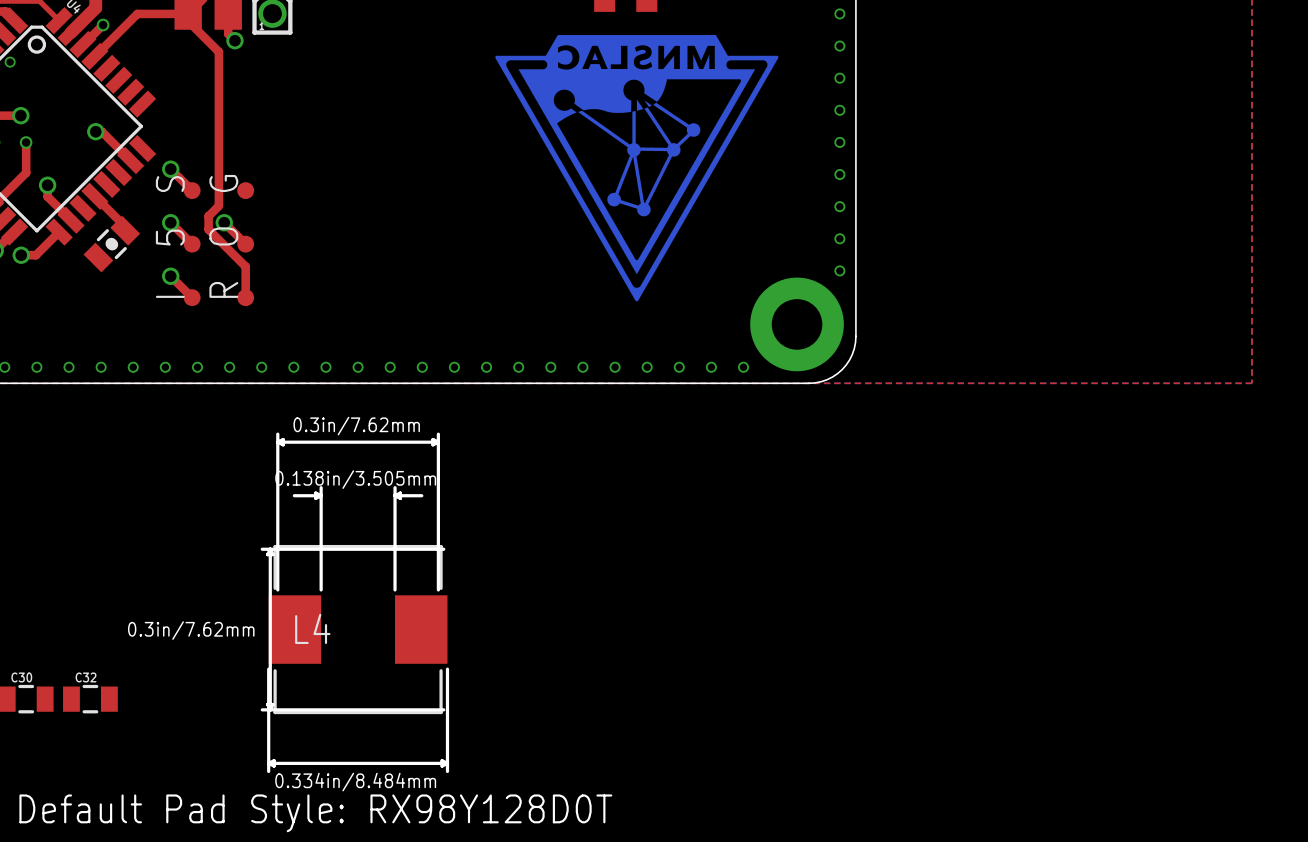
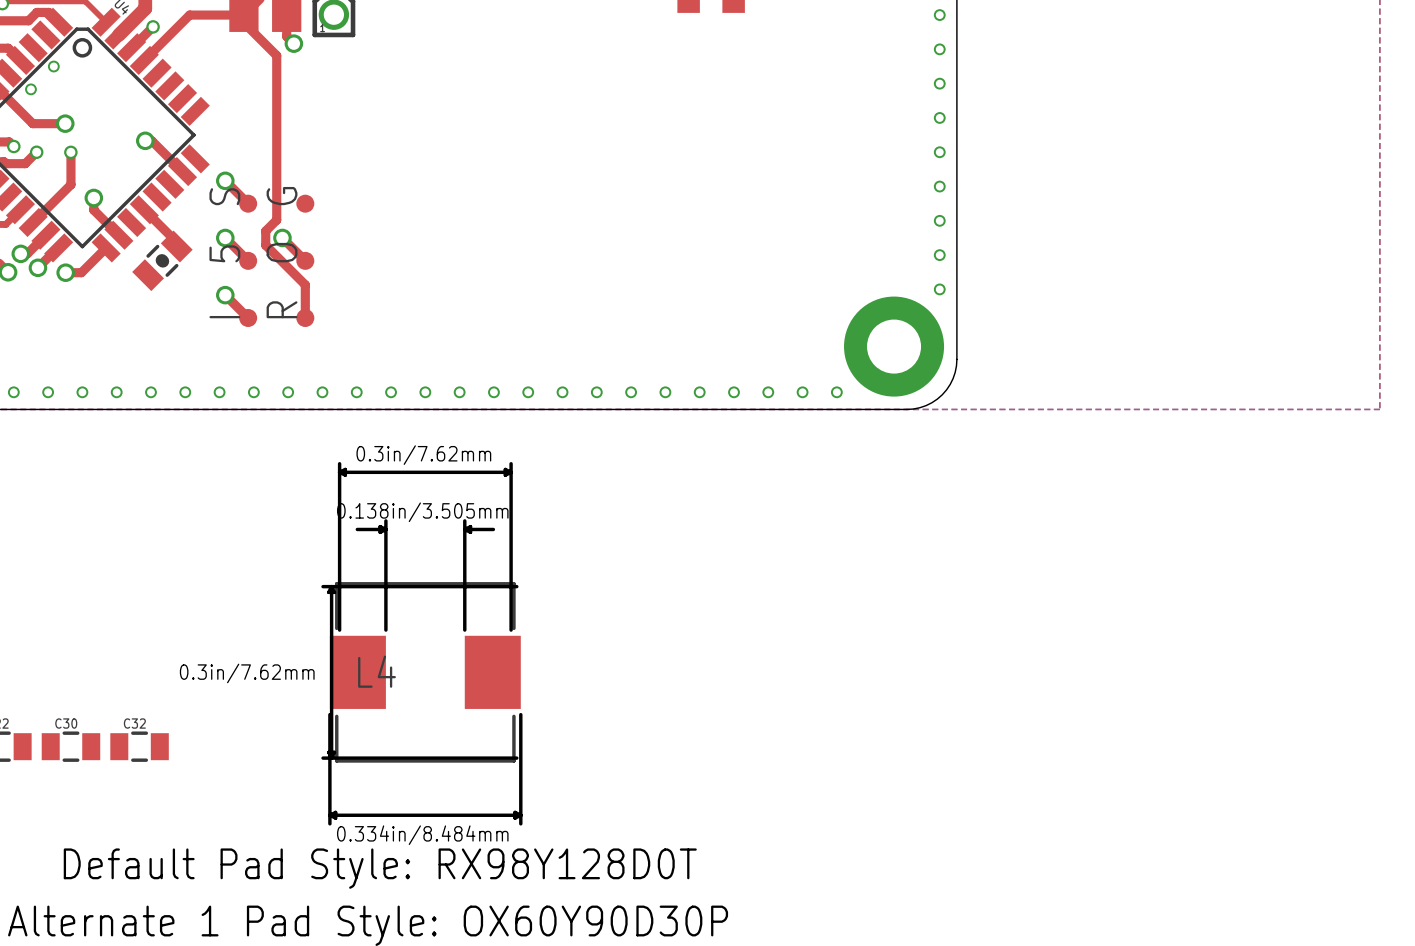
drawing: [495, 35, 779, 302] -> none

